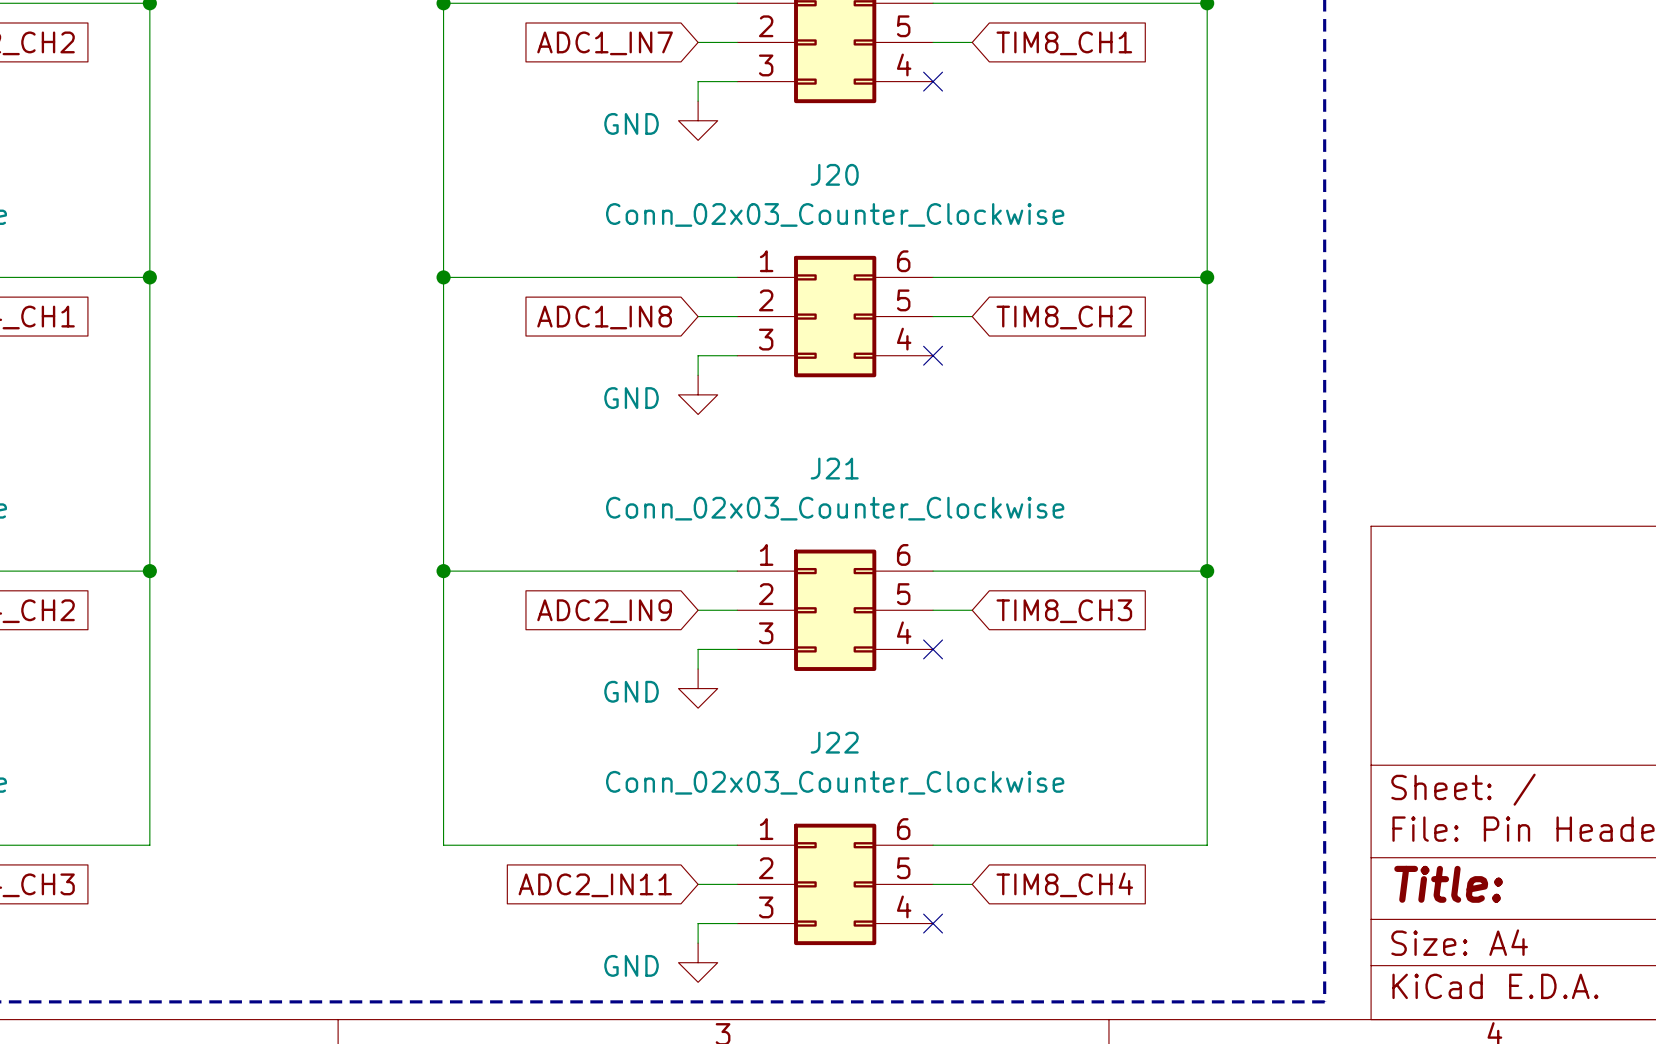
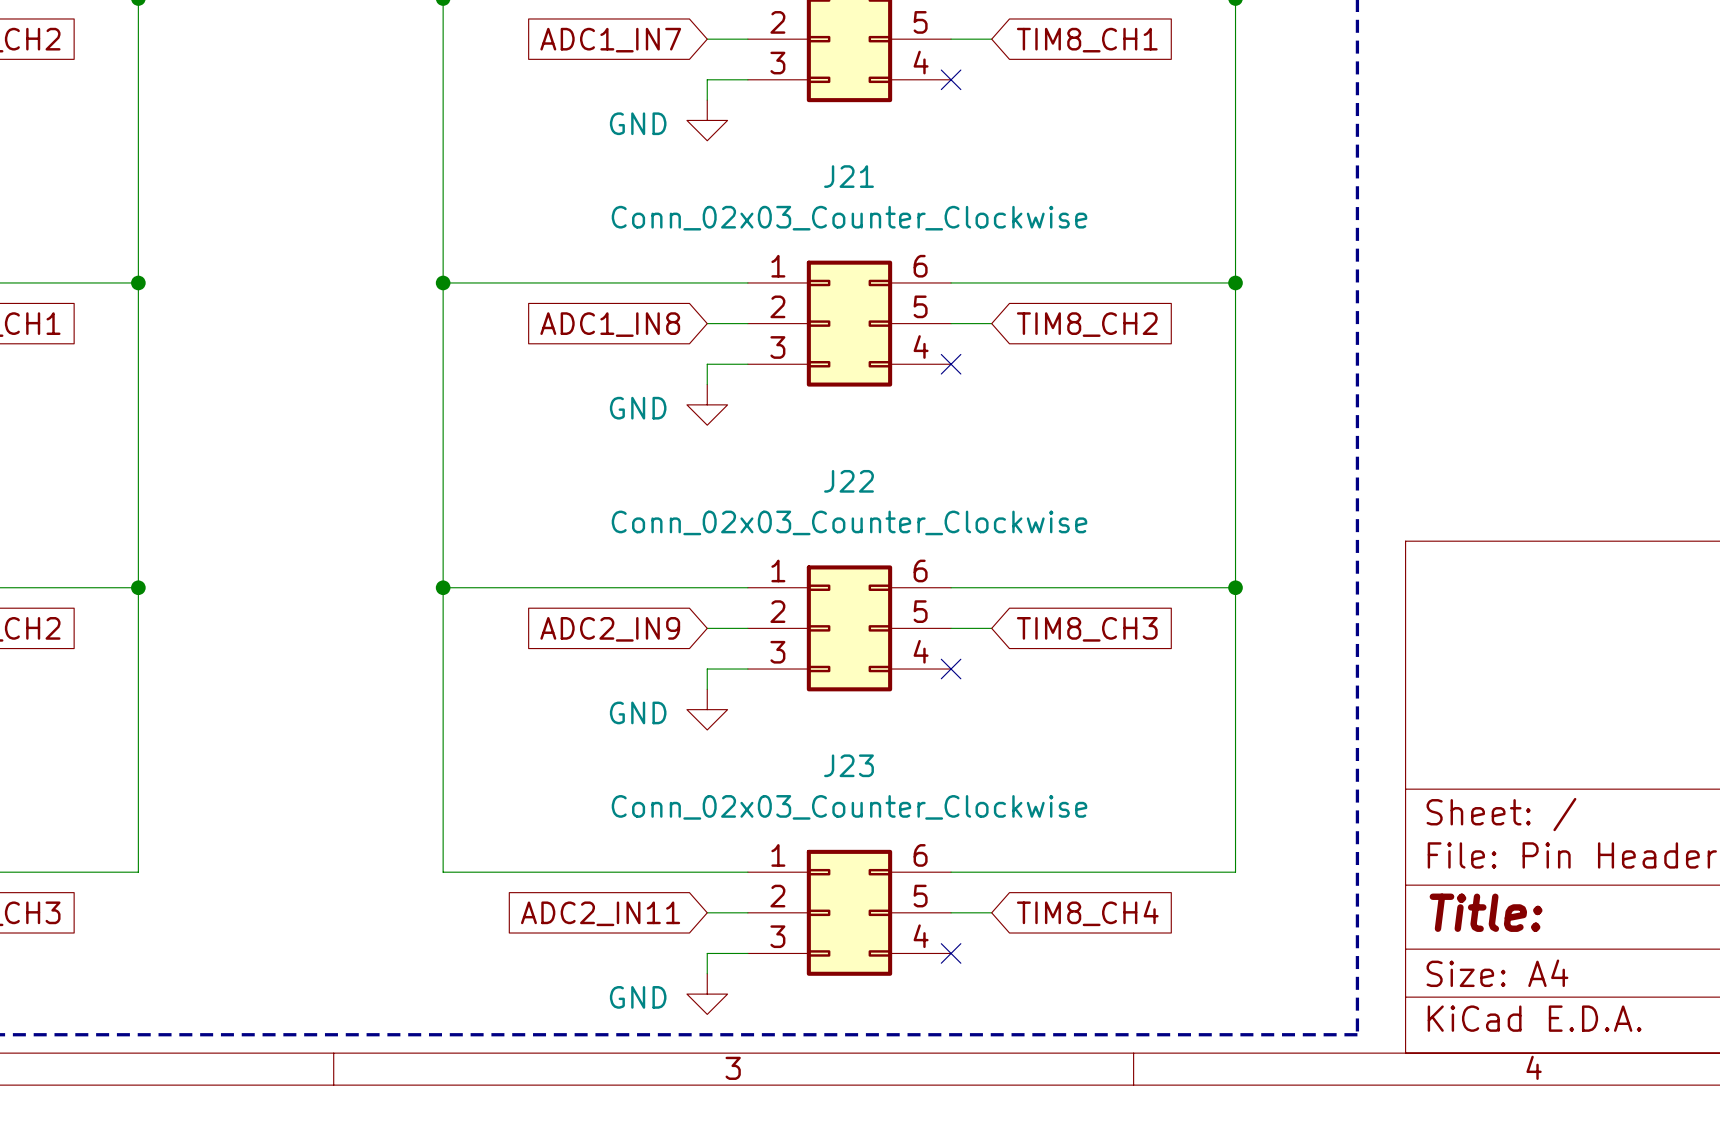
J20 name: J20 (834, 174) -> J21 (849, 176)
J21 name: J21 (834, 468) -> J22 (849, 481)
J22 name: J22 (834, 742) -> J23 (849, 765)

